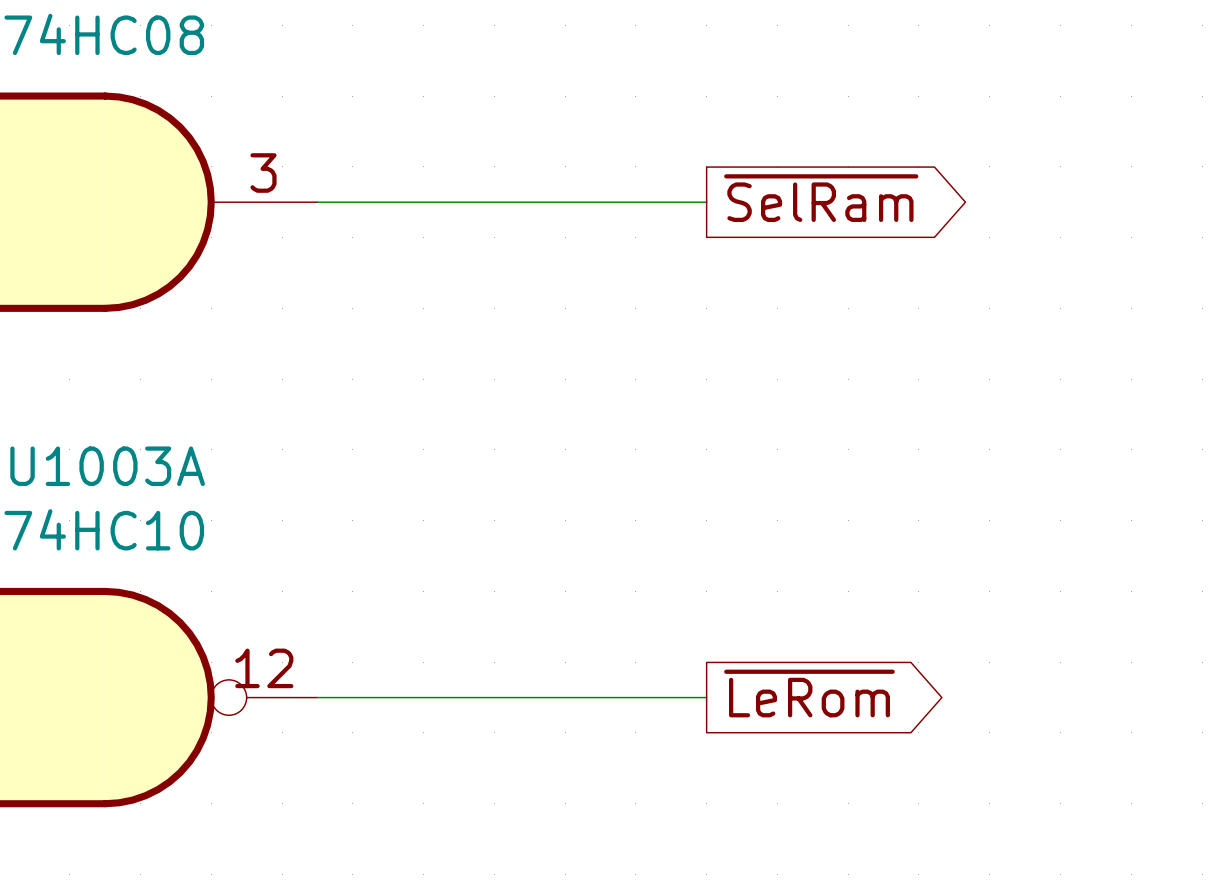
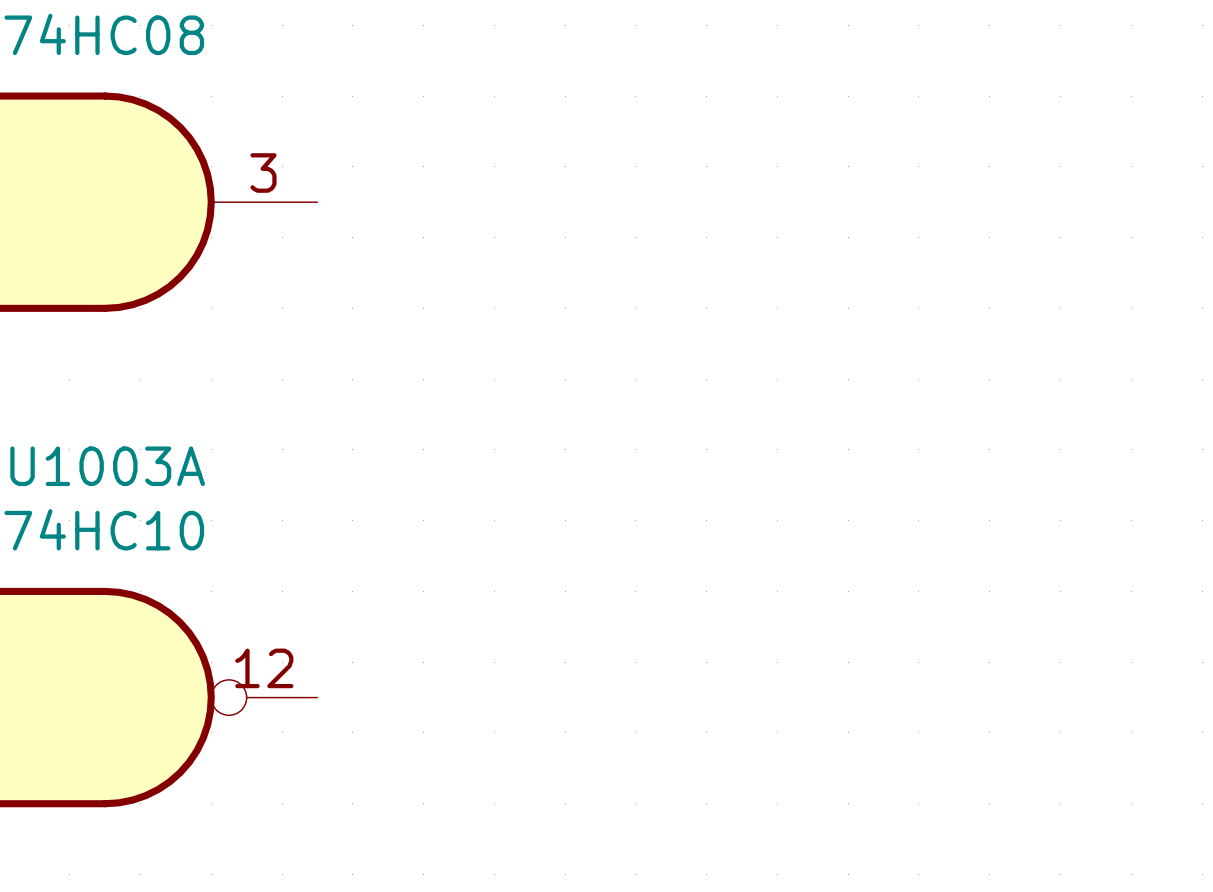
global label: ~{SelRam} (821, 198) -> none
wire: (317, 202) (706, 202) -> none
global label: ~{LeRom} (809, 693) -> none
wire: (317, 697) (706, 697) -> none

